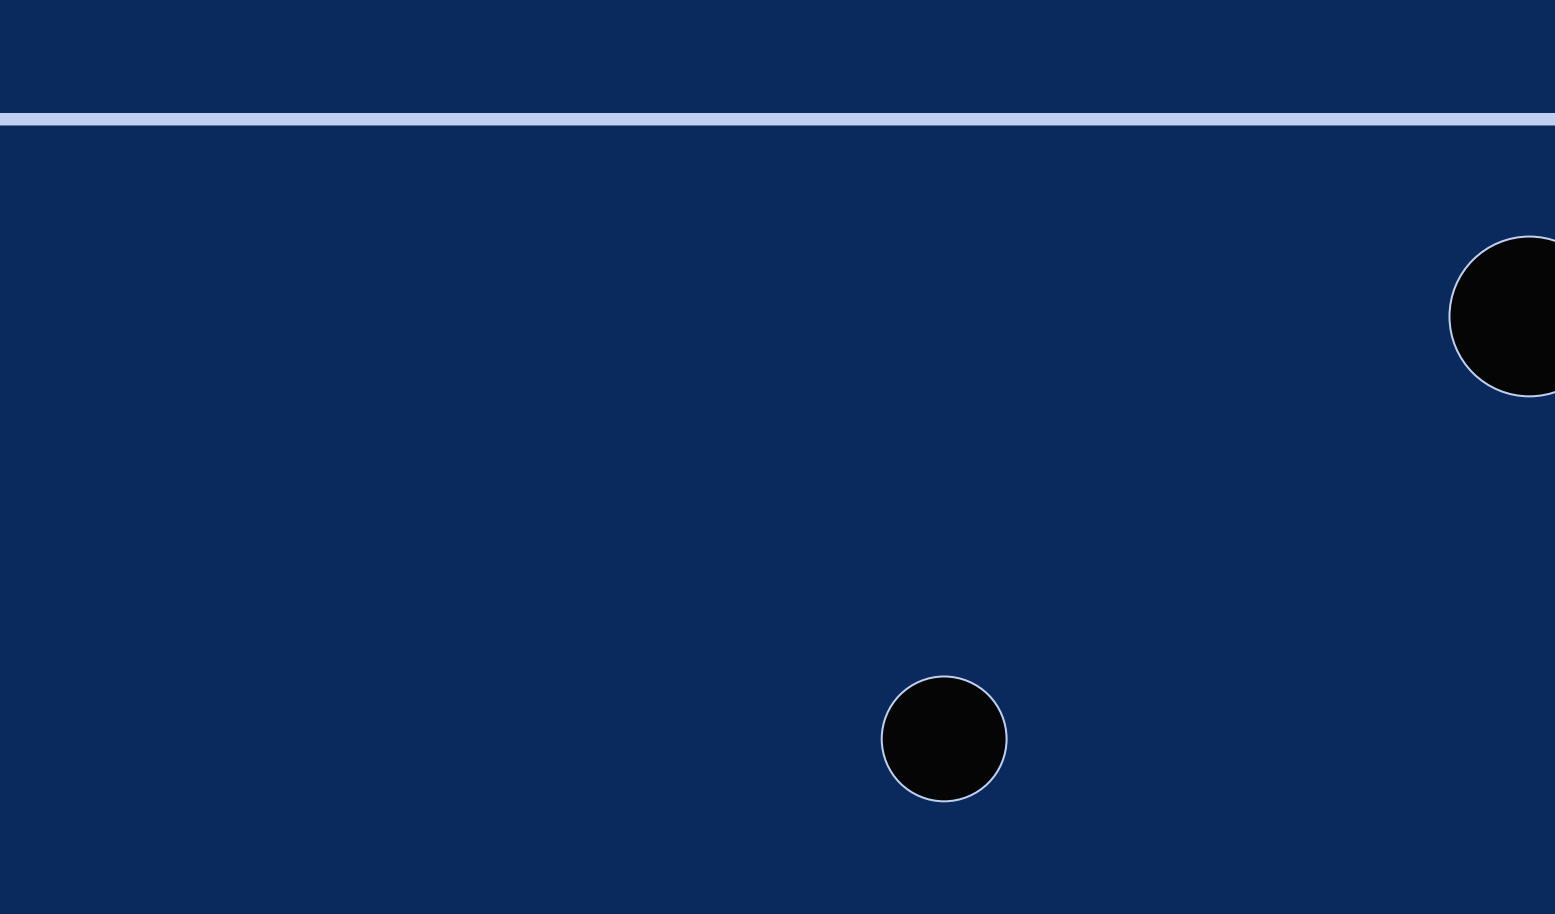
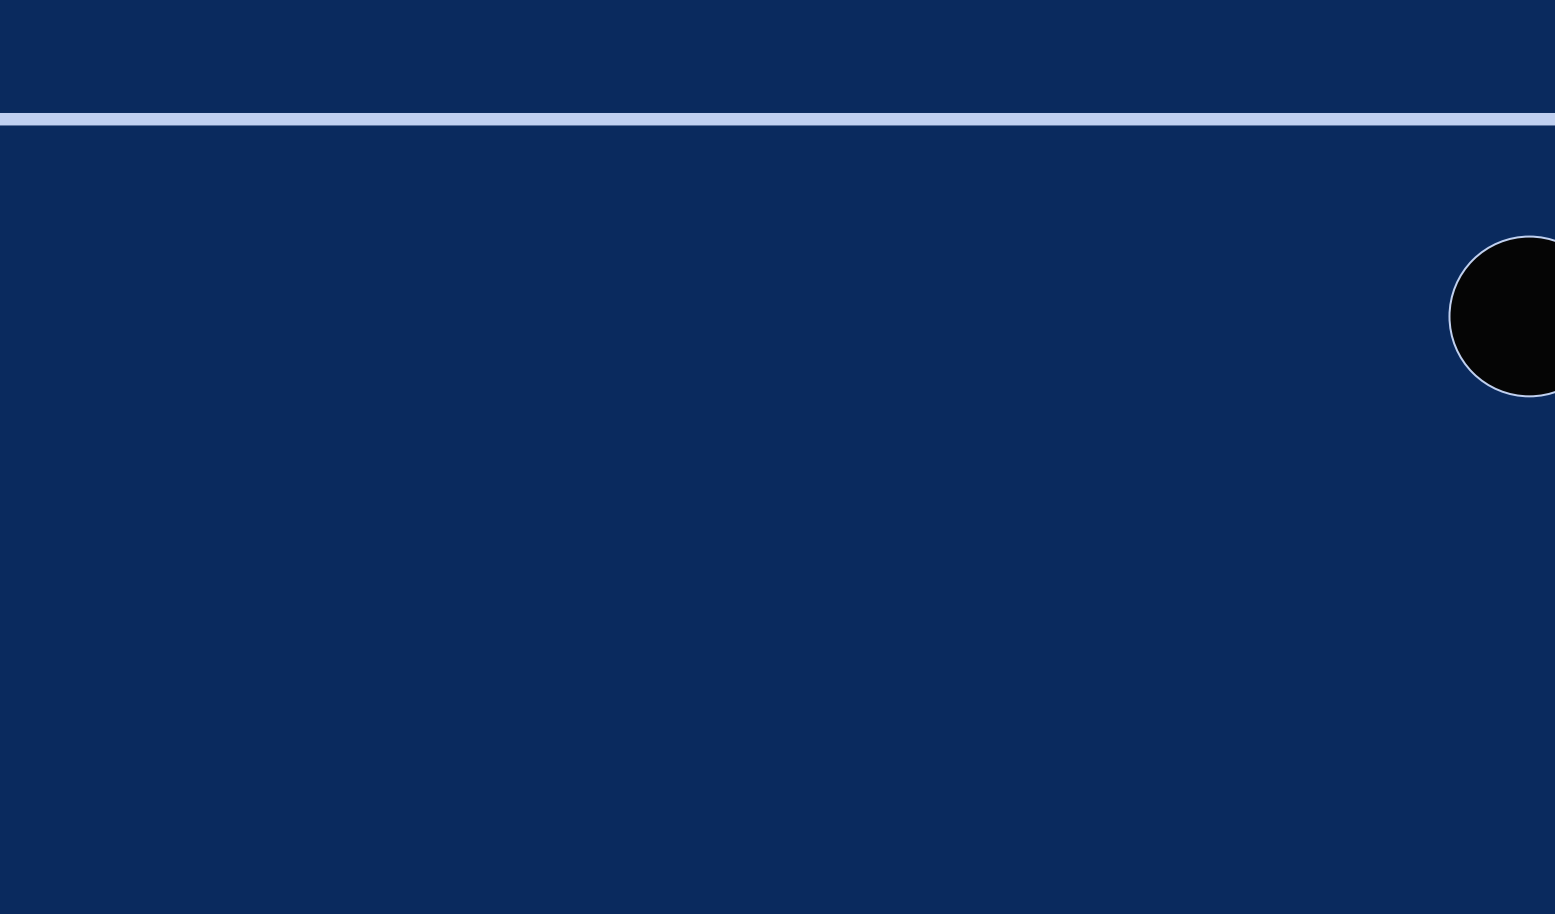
part: (944, 738) -> none

